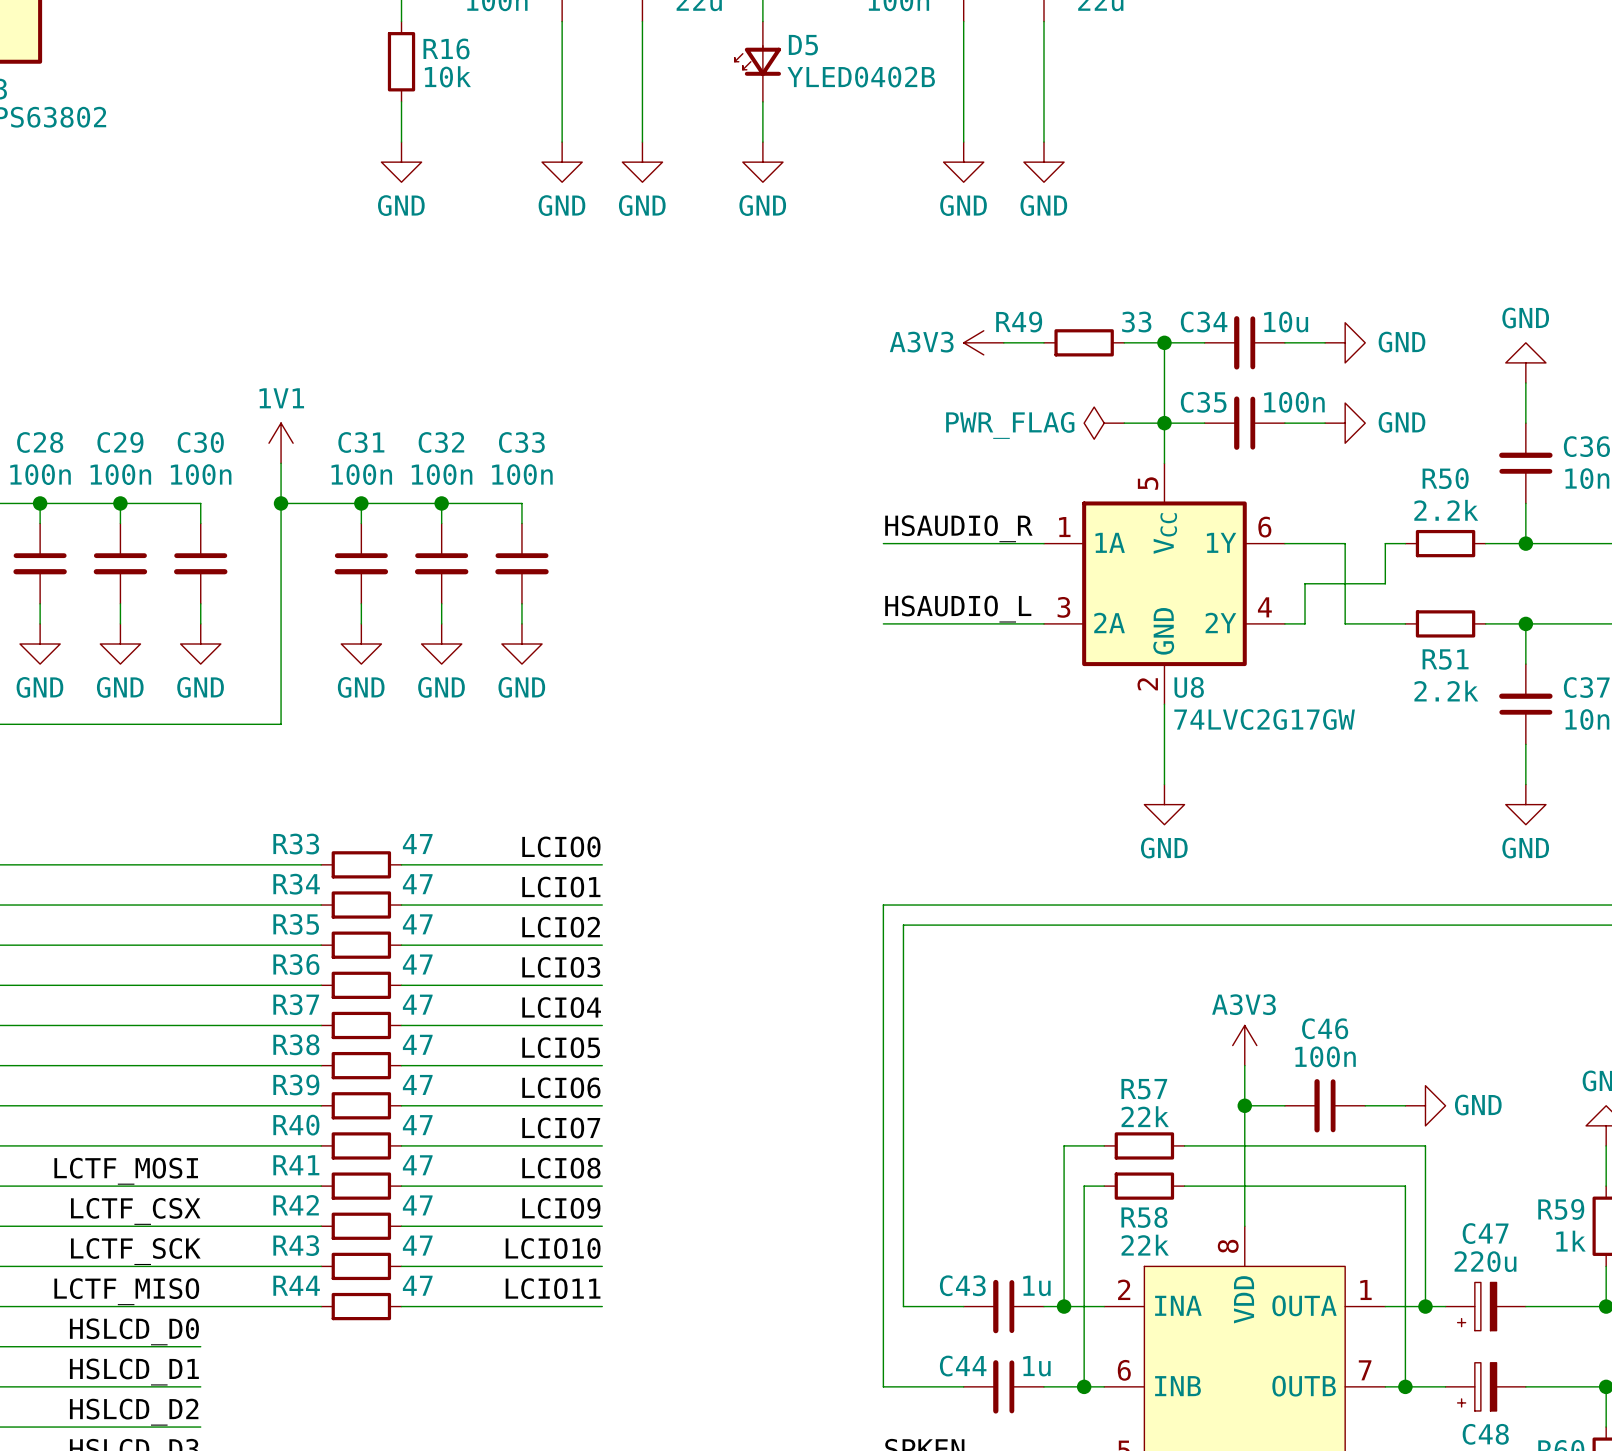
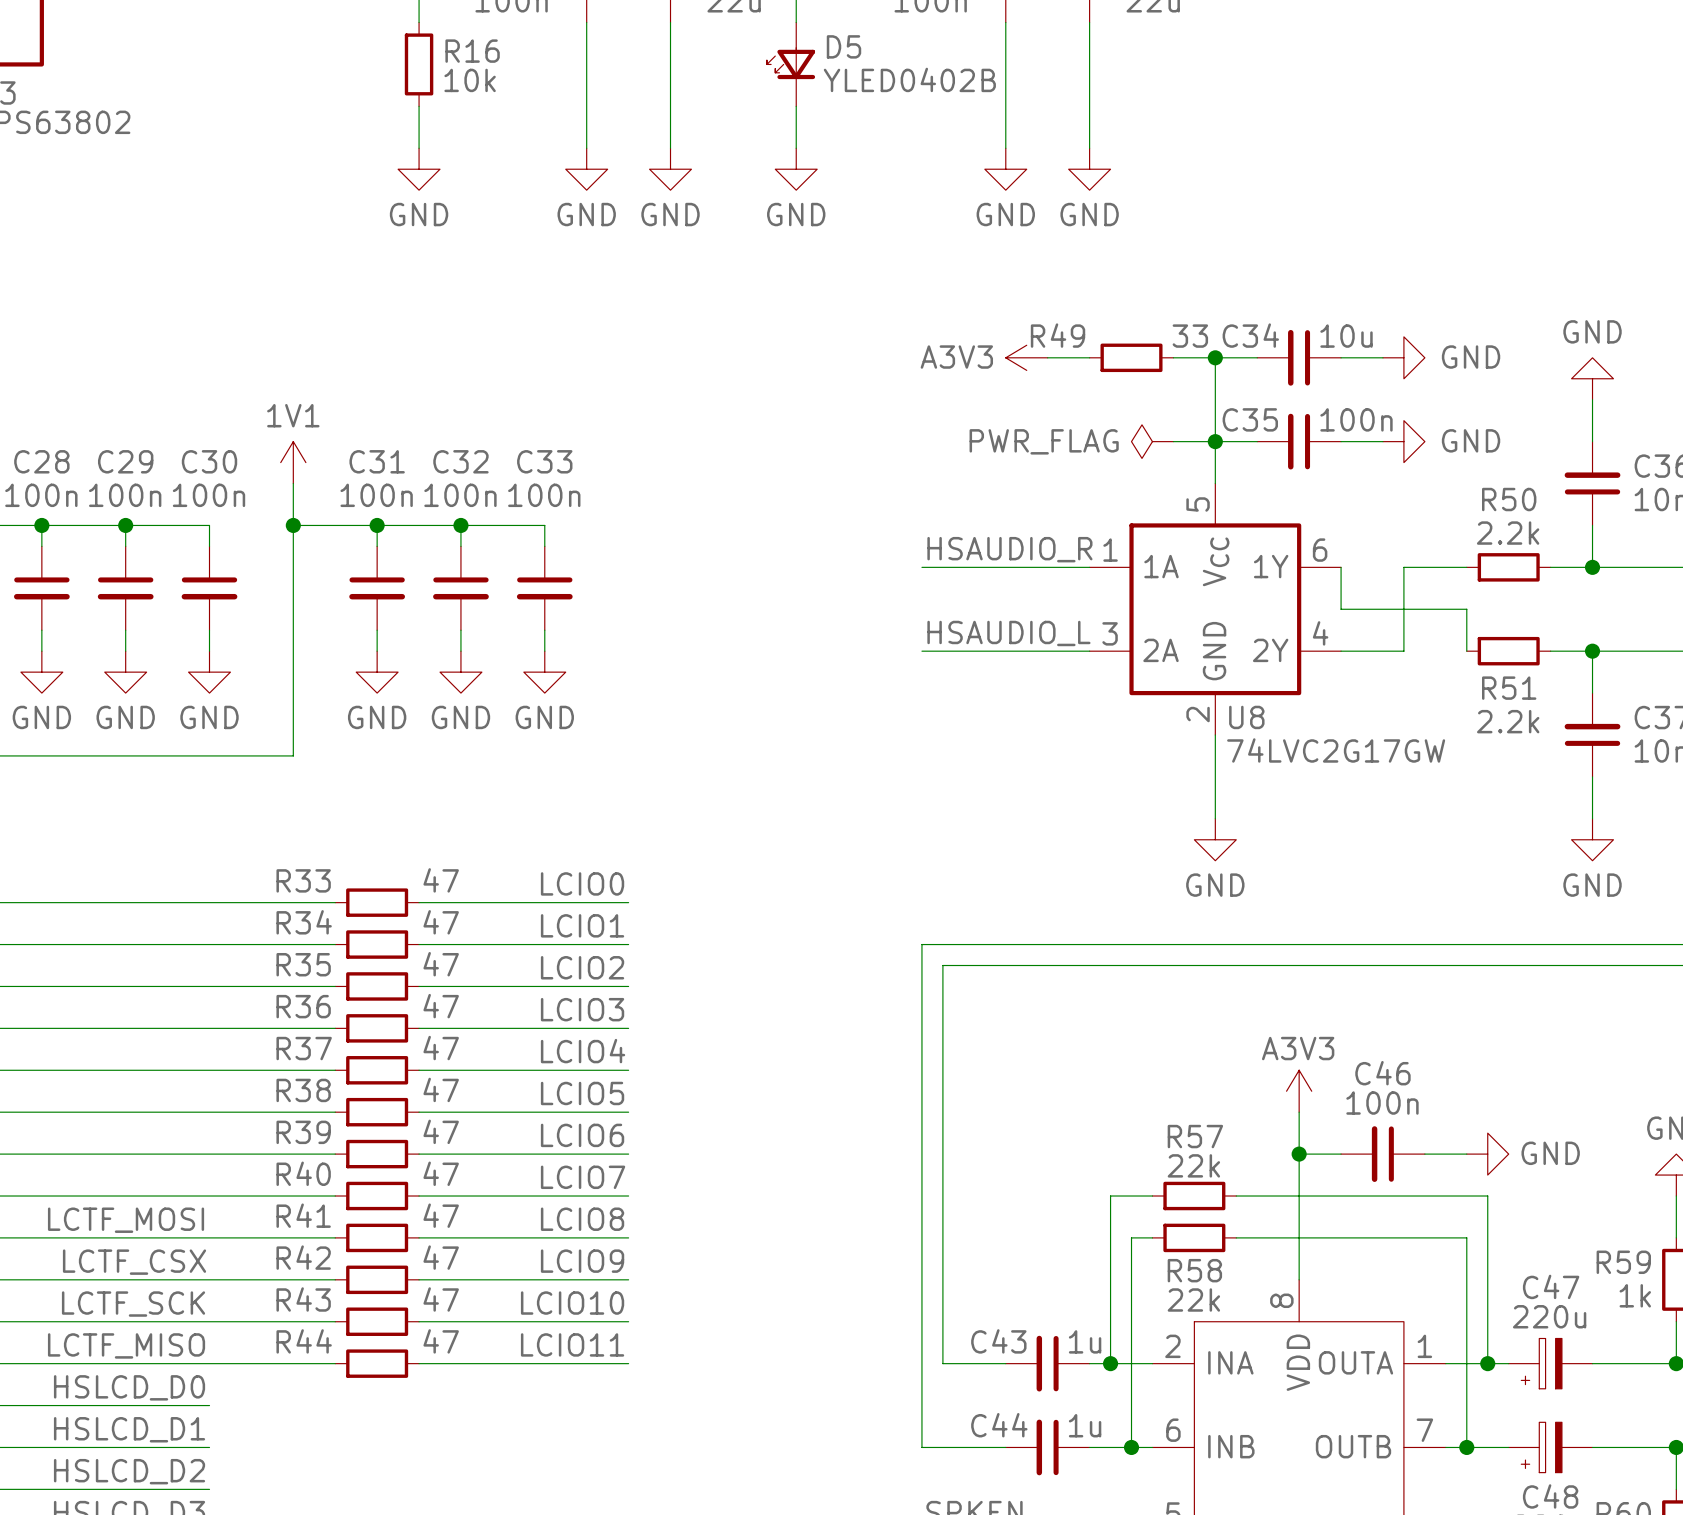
wire: (1284, 543) (1345, 543) -> (1341, 567) (1341, 609) (1362, 609)
wire: (1385, 543) (1385, 583) -> (1445, 567) (1403, 567)
wire: (1305, 583) (1305, 623) -> (1403, 651) (1362, 651)
wire: (1345, 623) (1405, 623) -> (1445, 609) (1466, 609) (1466, 651)

